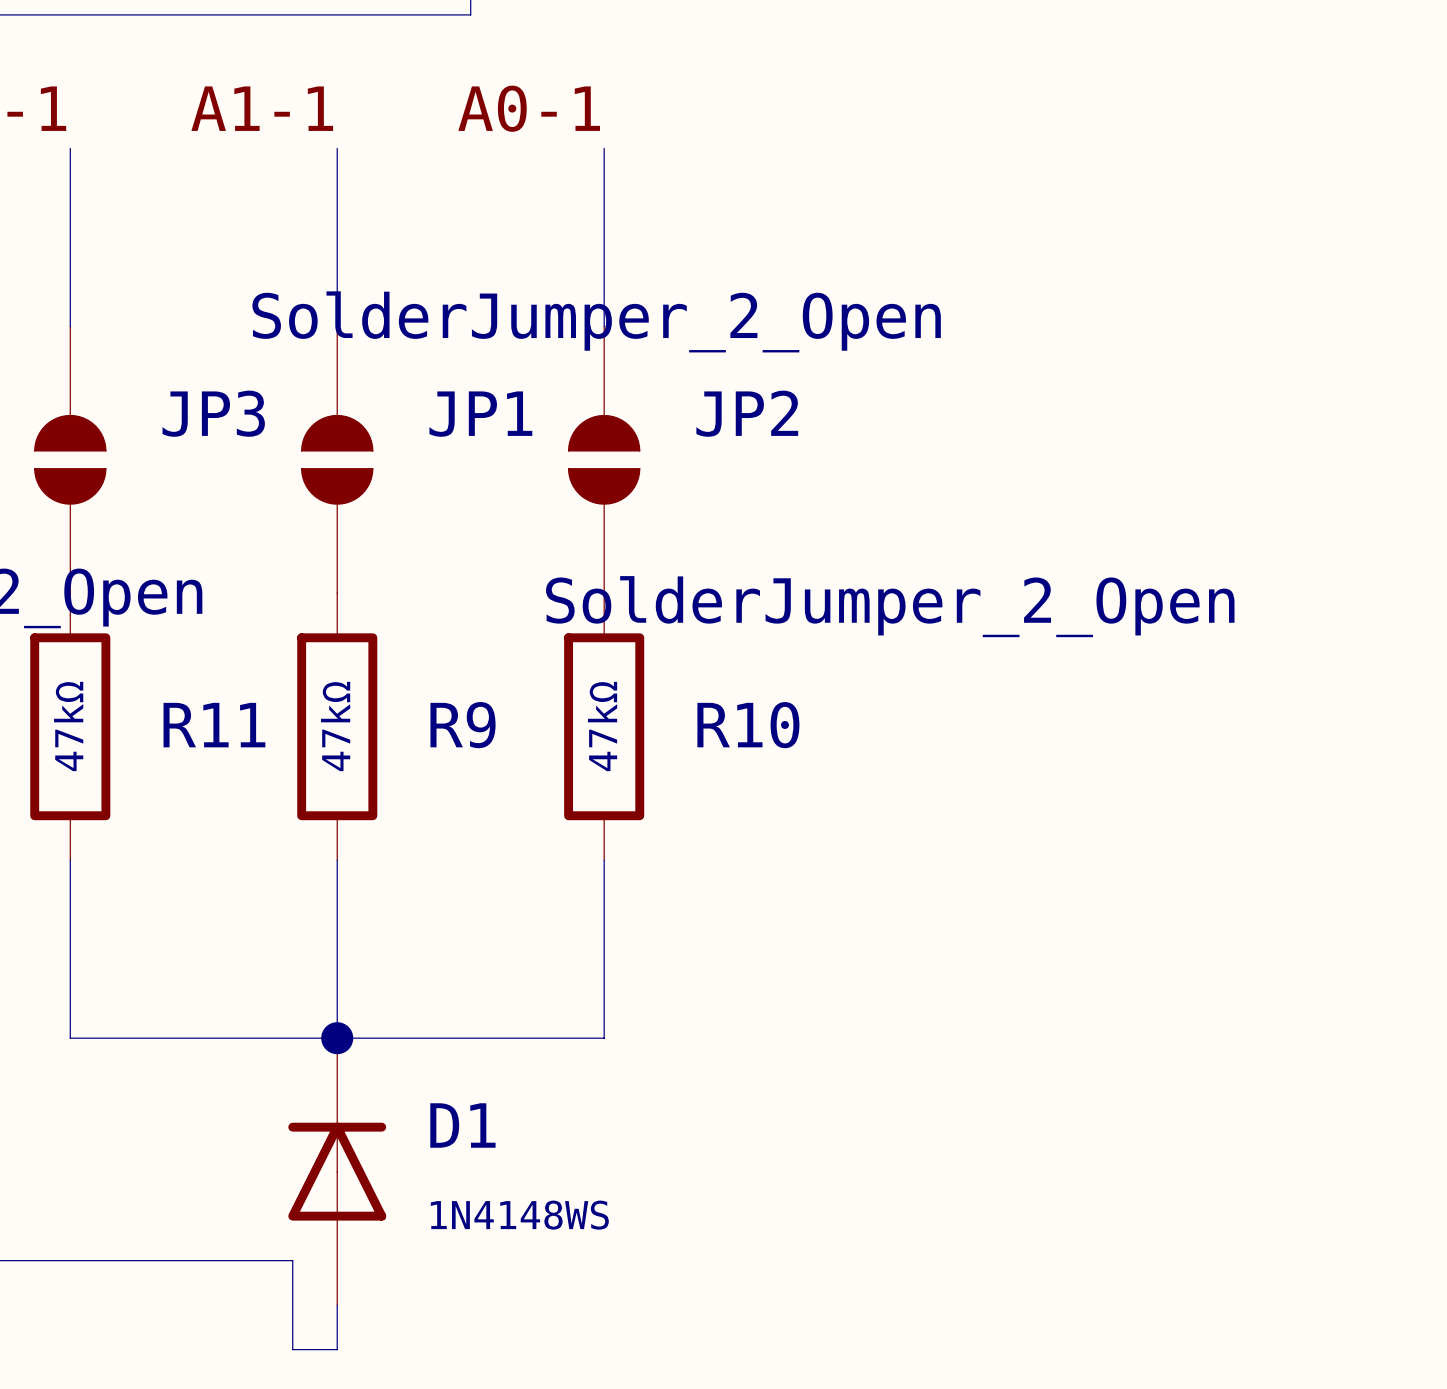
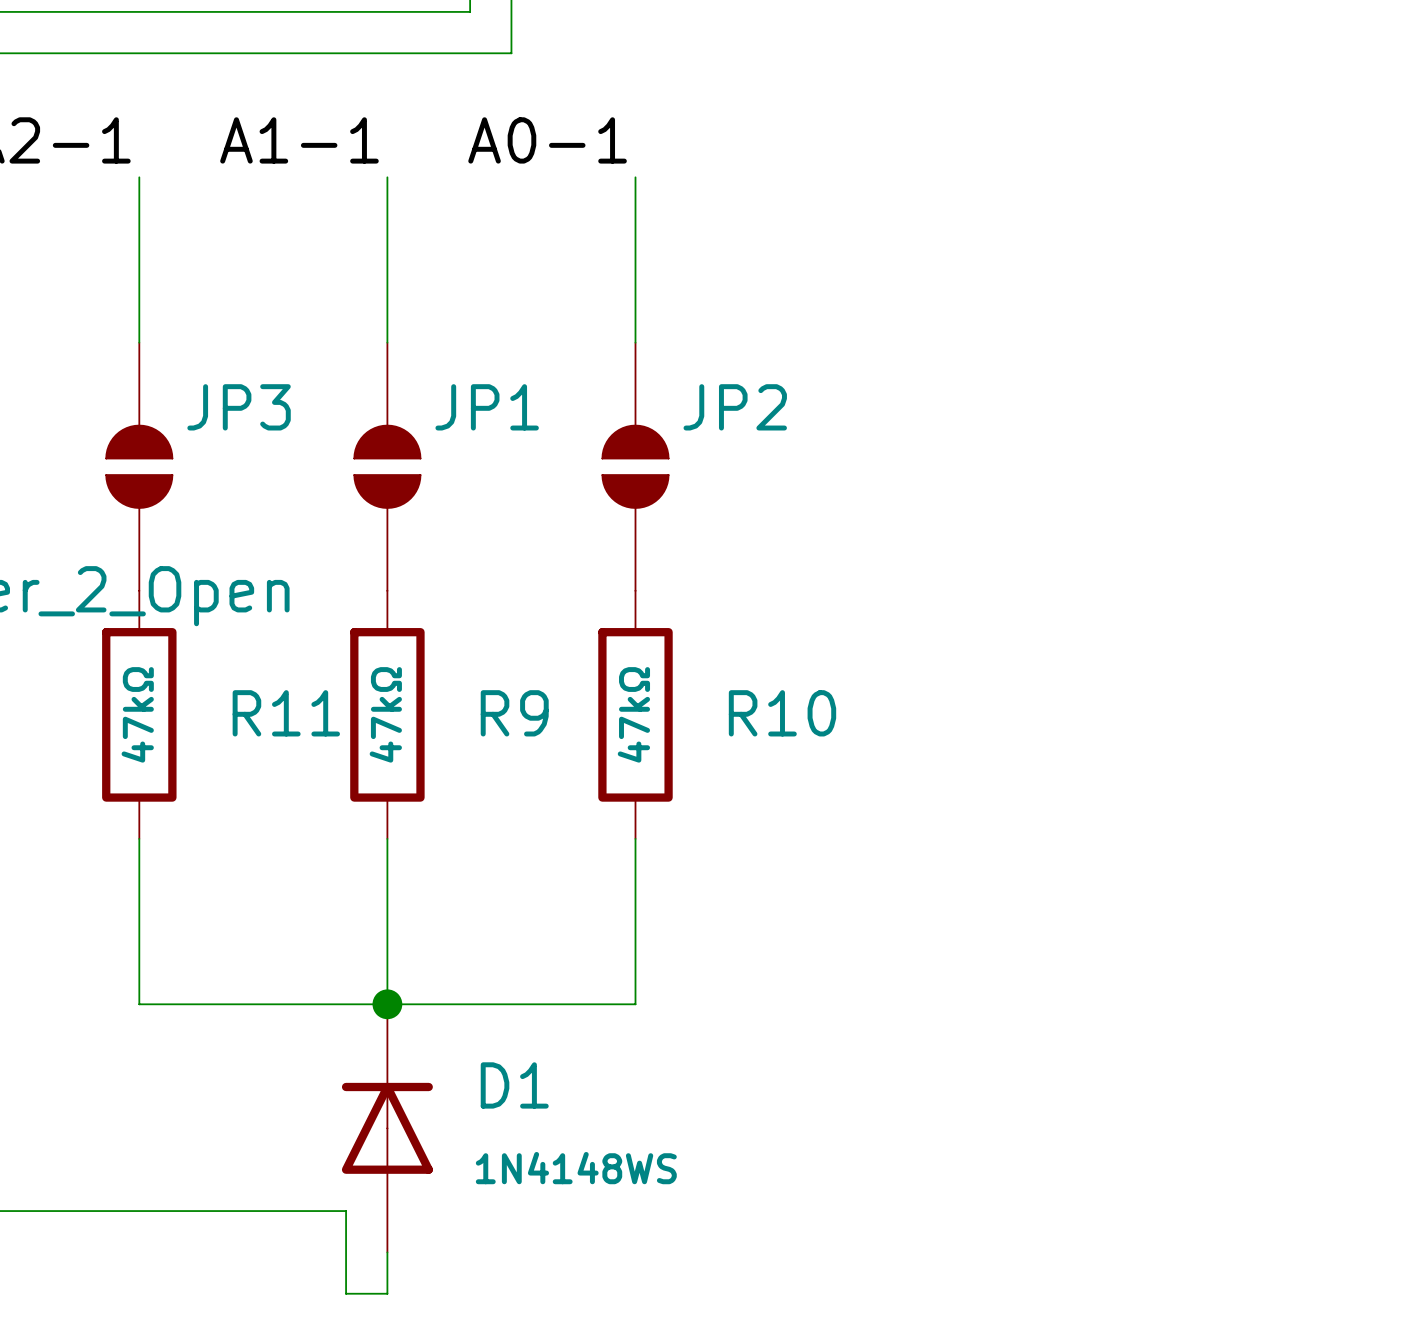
JP1 value: SolderJumper_2_Open (596, 321) -> none
JP3 name position: JP3 (213, 413) -> JP3 (239, 407)
JP2 name position: JP2 (747, 413) -> JP2 (735, 407)
JP1 name position: JP1 (480, 414) -> JP1 (487, 407)
JP2 value: SolderJumper_2_Open (890, 606) -> none

